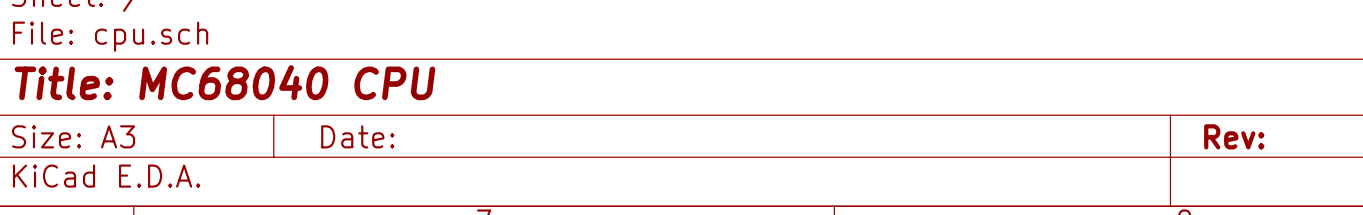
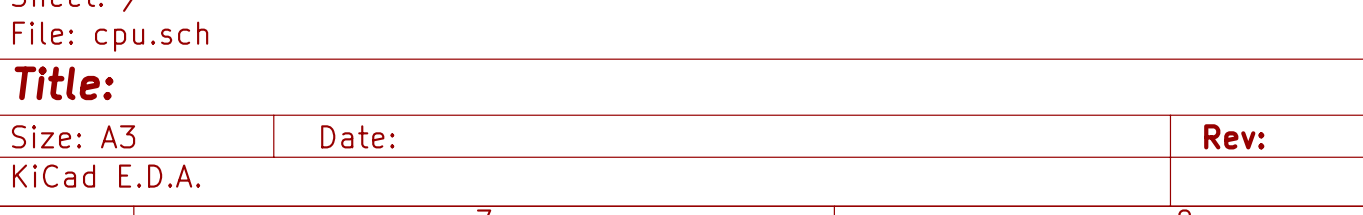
title block: Title: MC68040 CPU (224, 82) -> Title: (64, 83)

